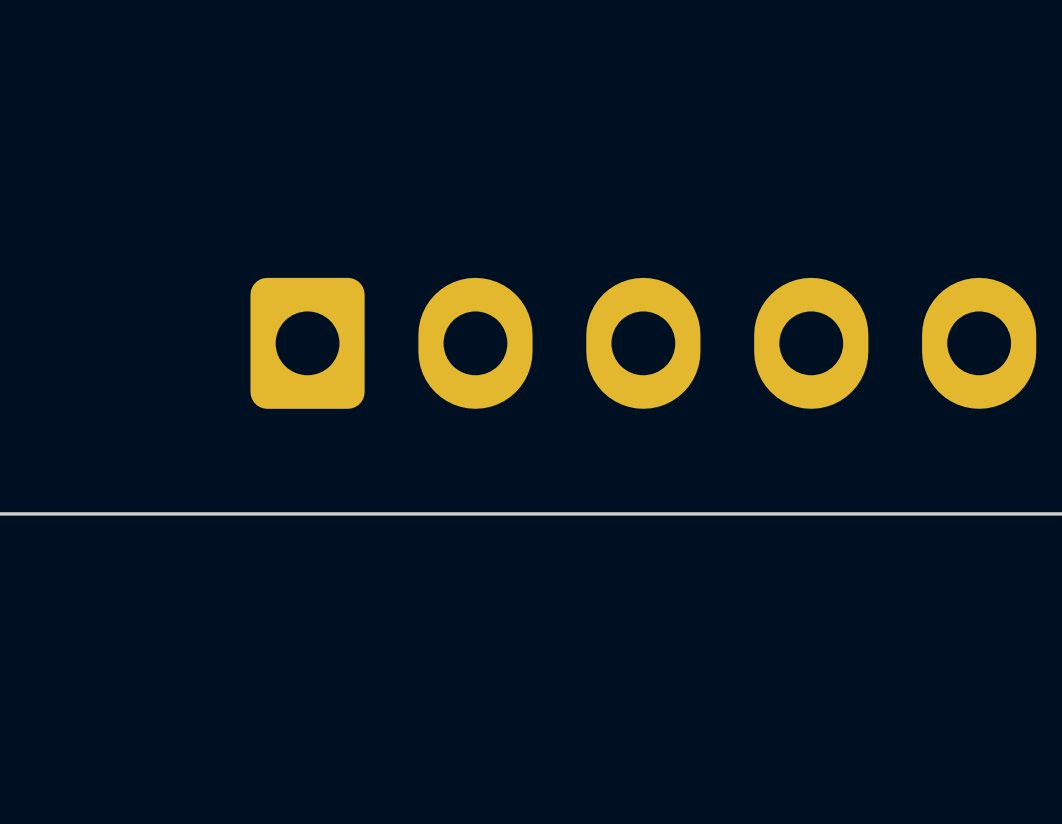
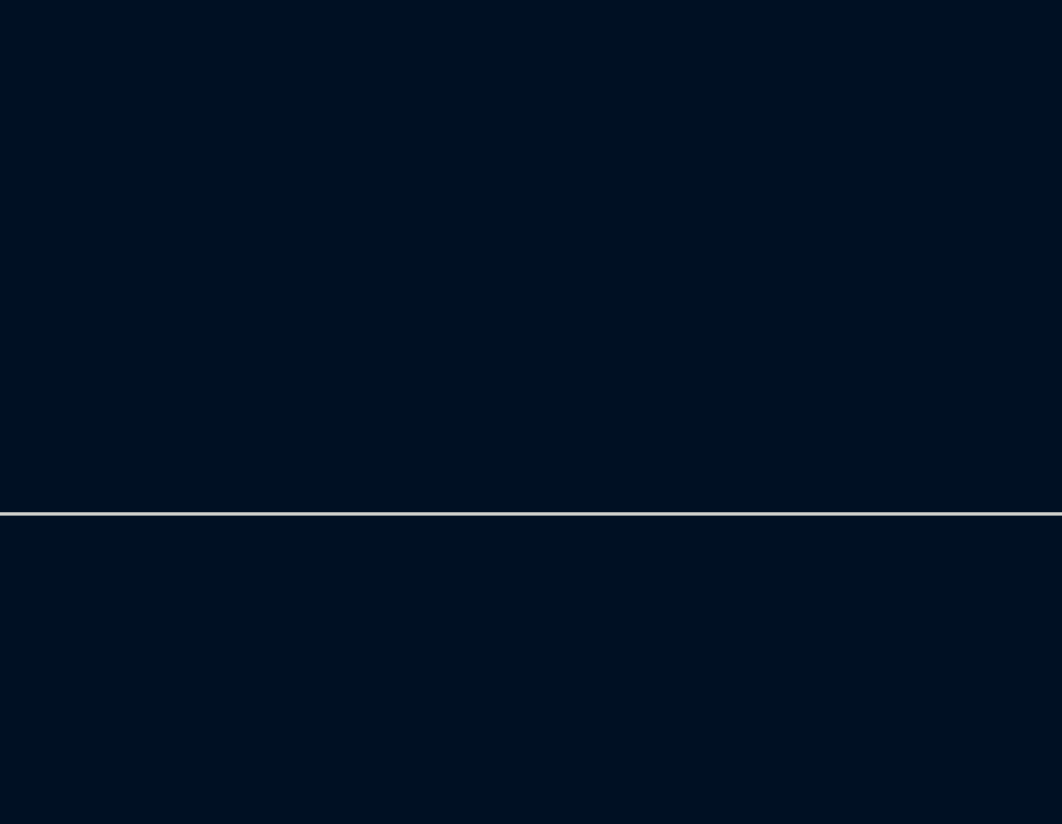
part: (643, 343) -> none

